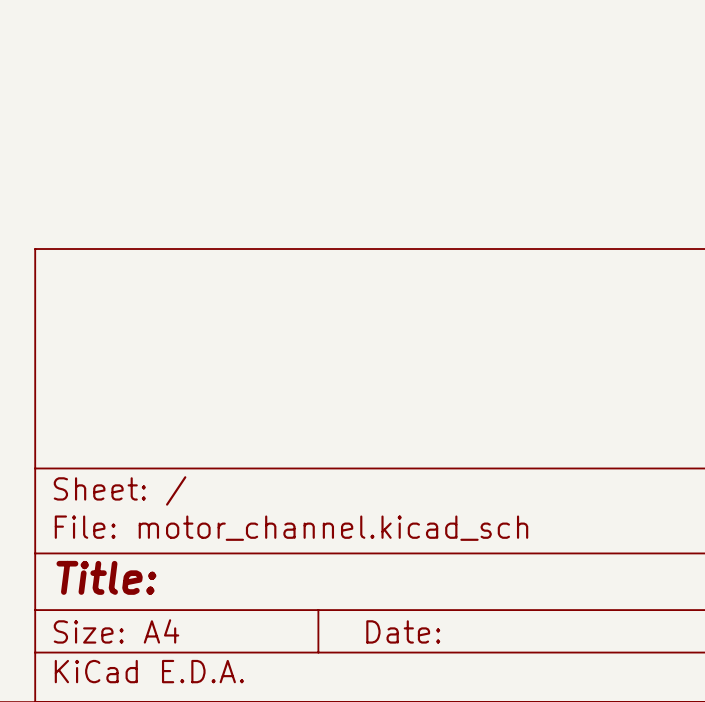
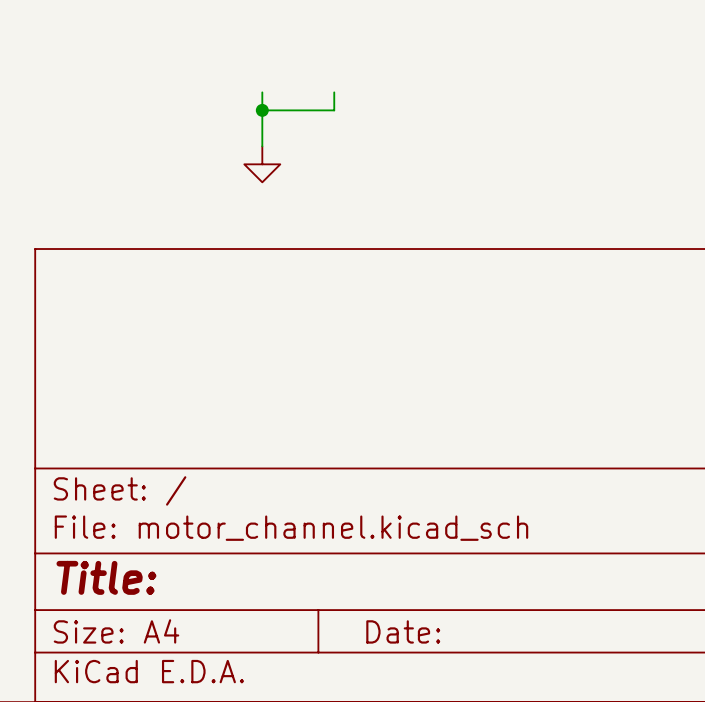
wire: none -> (262, 92) (262, 146)
wire: none -> (334, 92) (334, 110) (262, 110)
junction: none -> (262, 110)
power symbol: none -> (262, 164)

